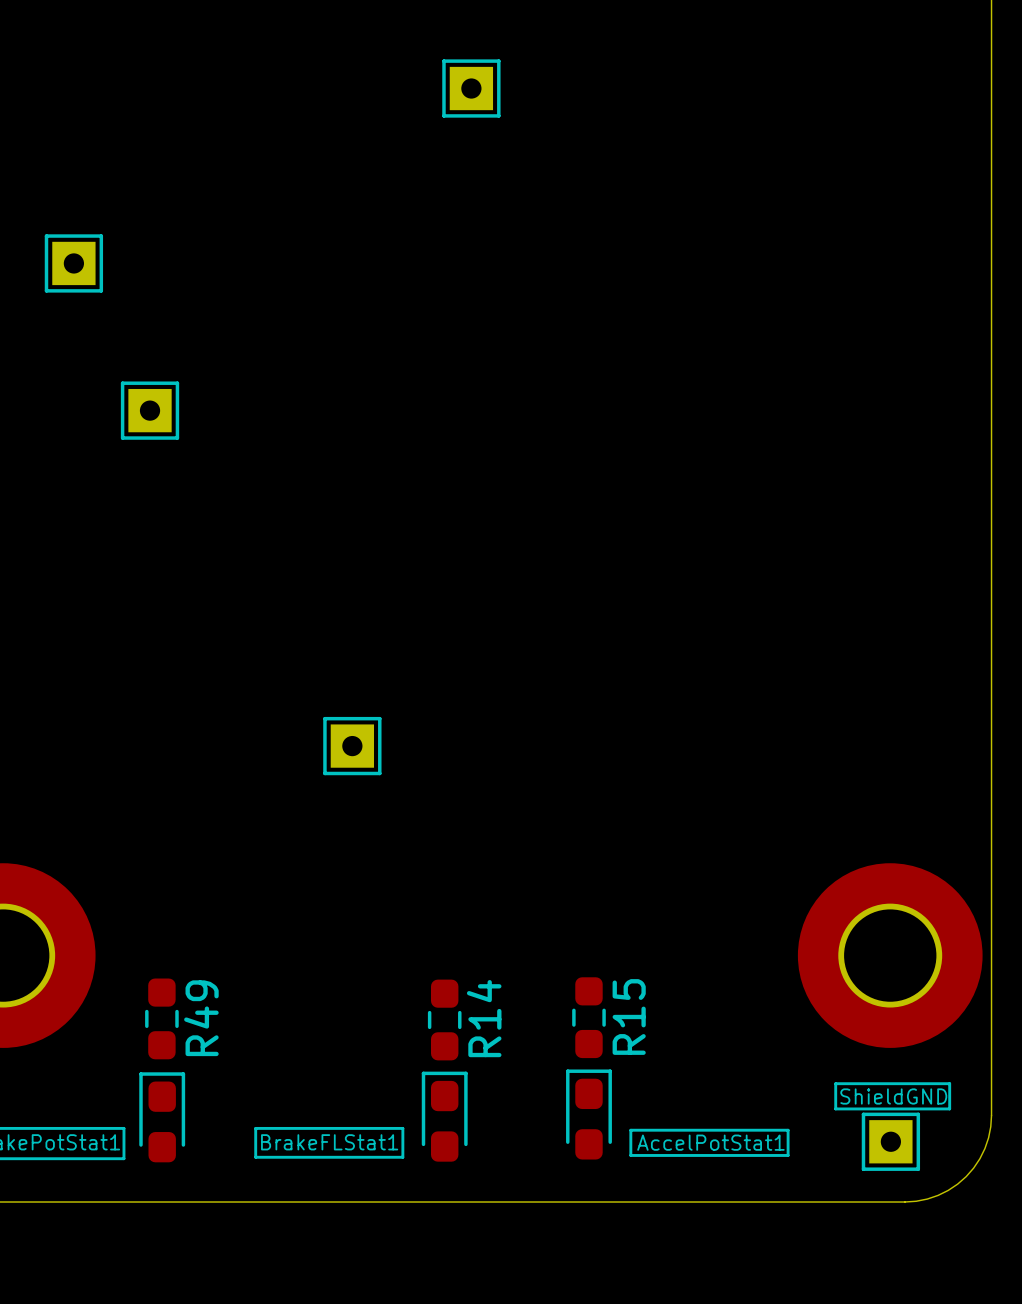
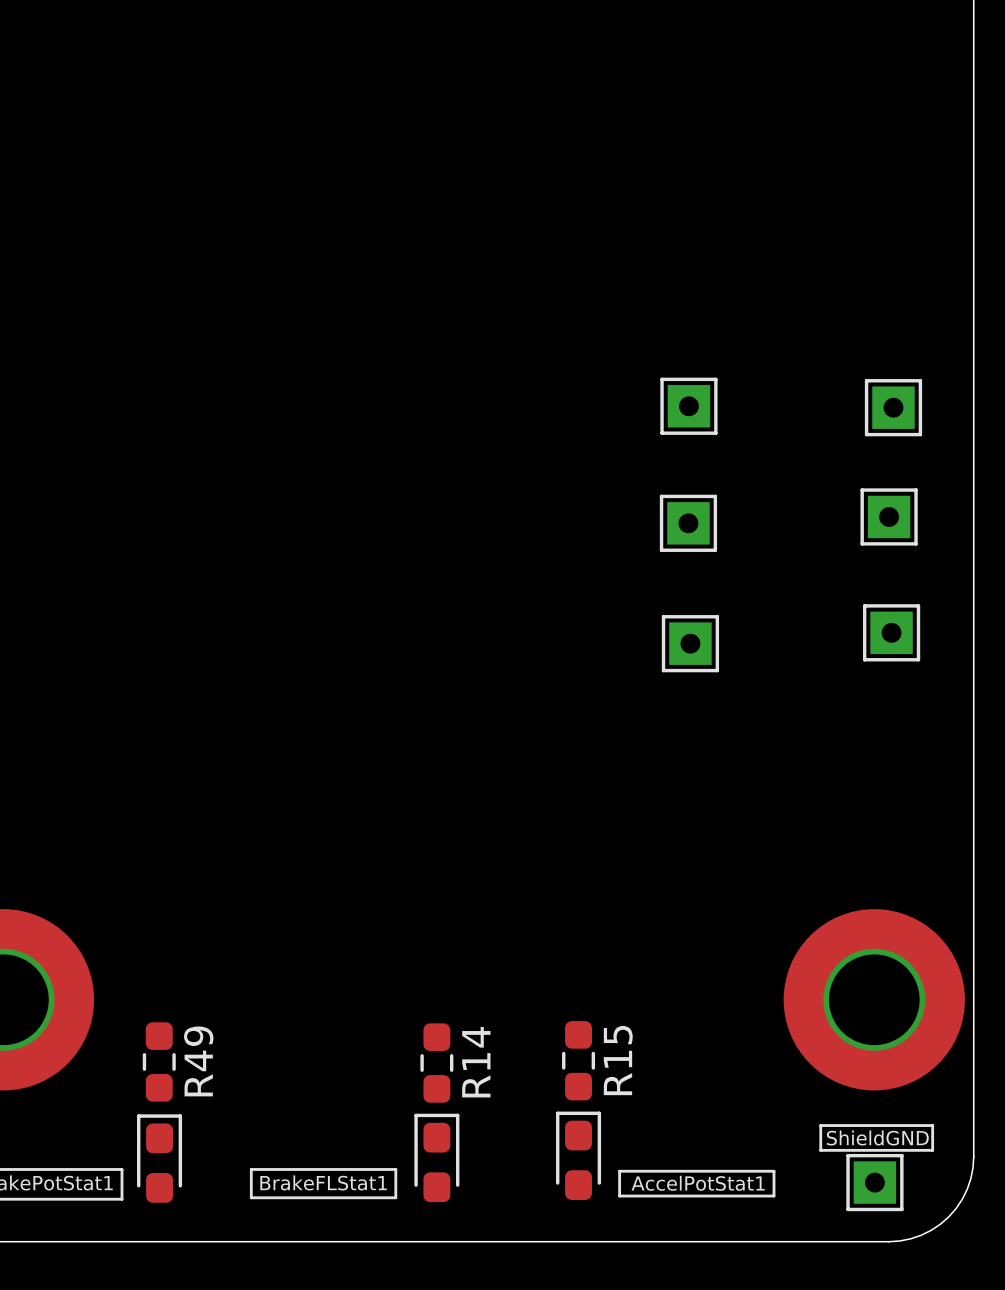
part: (471, 88) -> none
part: (73, 263) -> none
part: none -> (688, 406)
part: none -> (893, 407)
part: (150, 410) -> none
part: none -> (889, 516)
part: none -> (688, 523)
part: none -> (891, 632)
part: none -> (690, 643)
part: (352, 746) -> none

